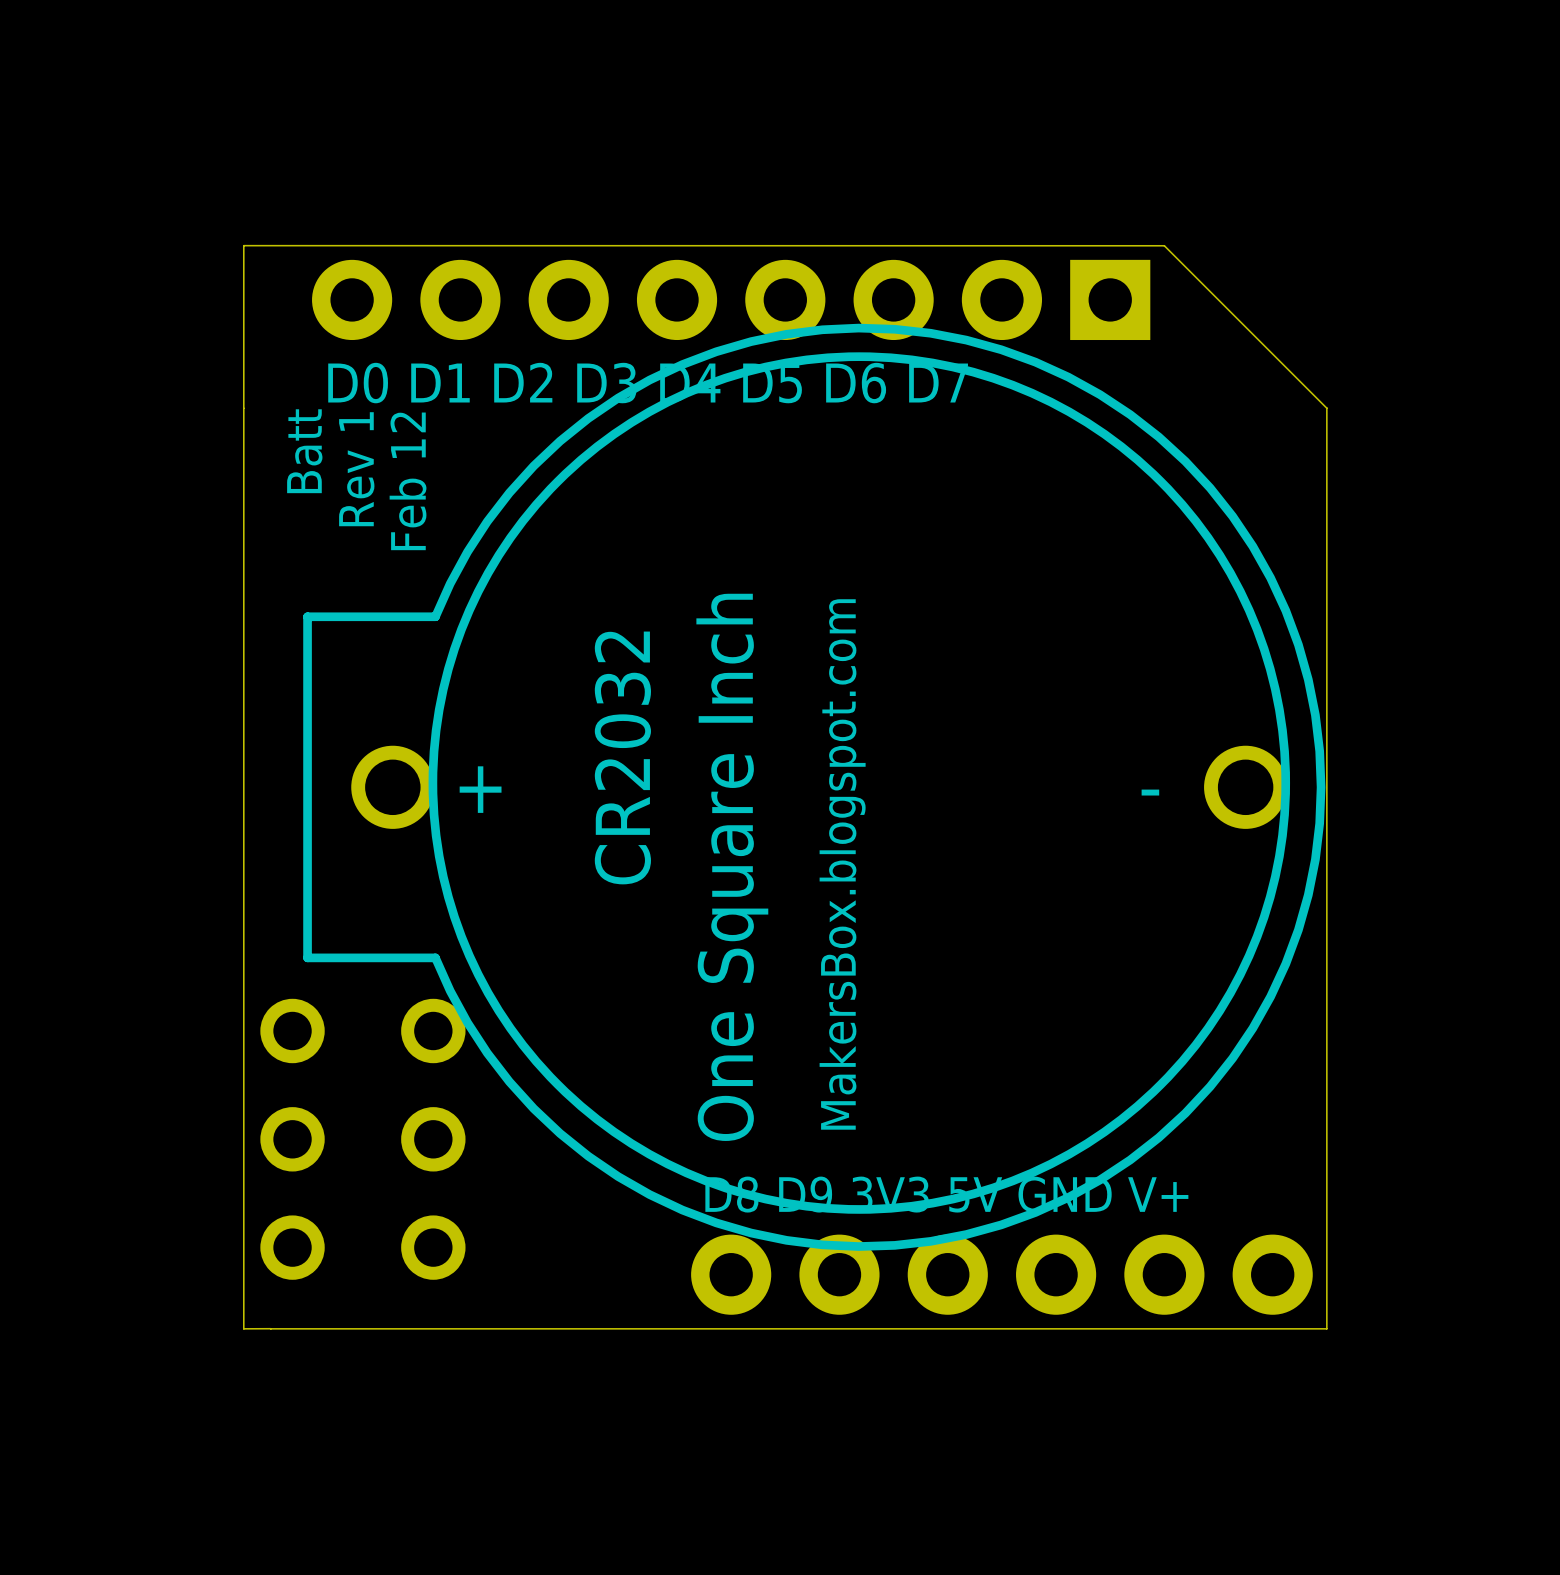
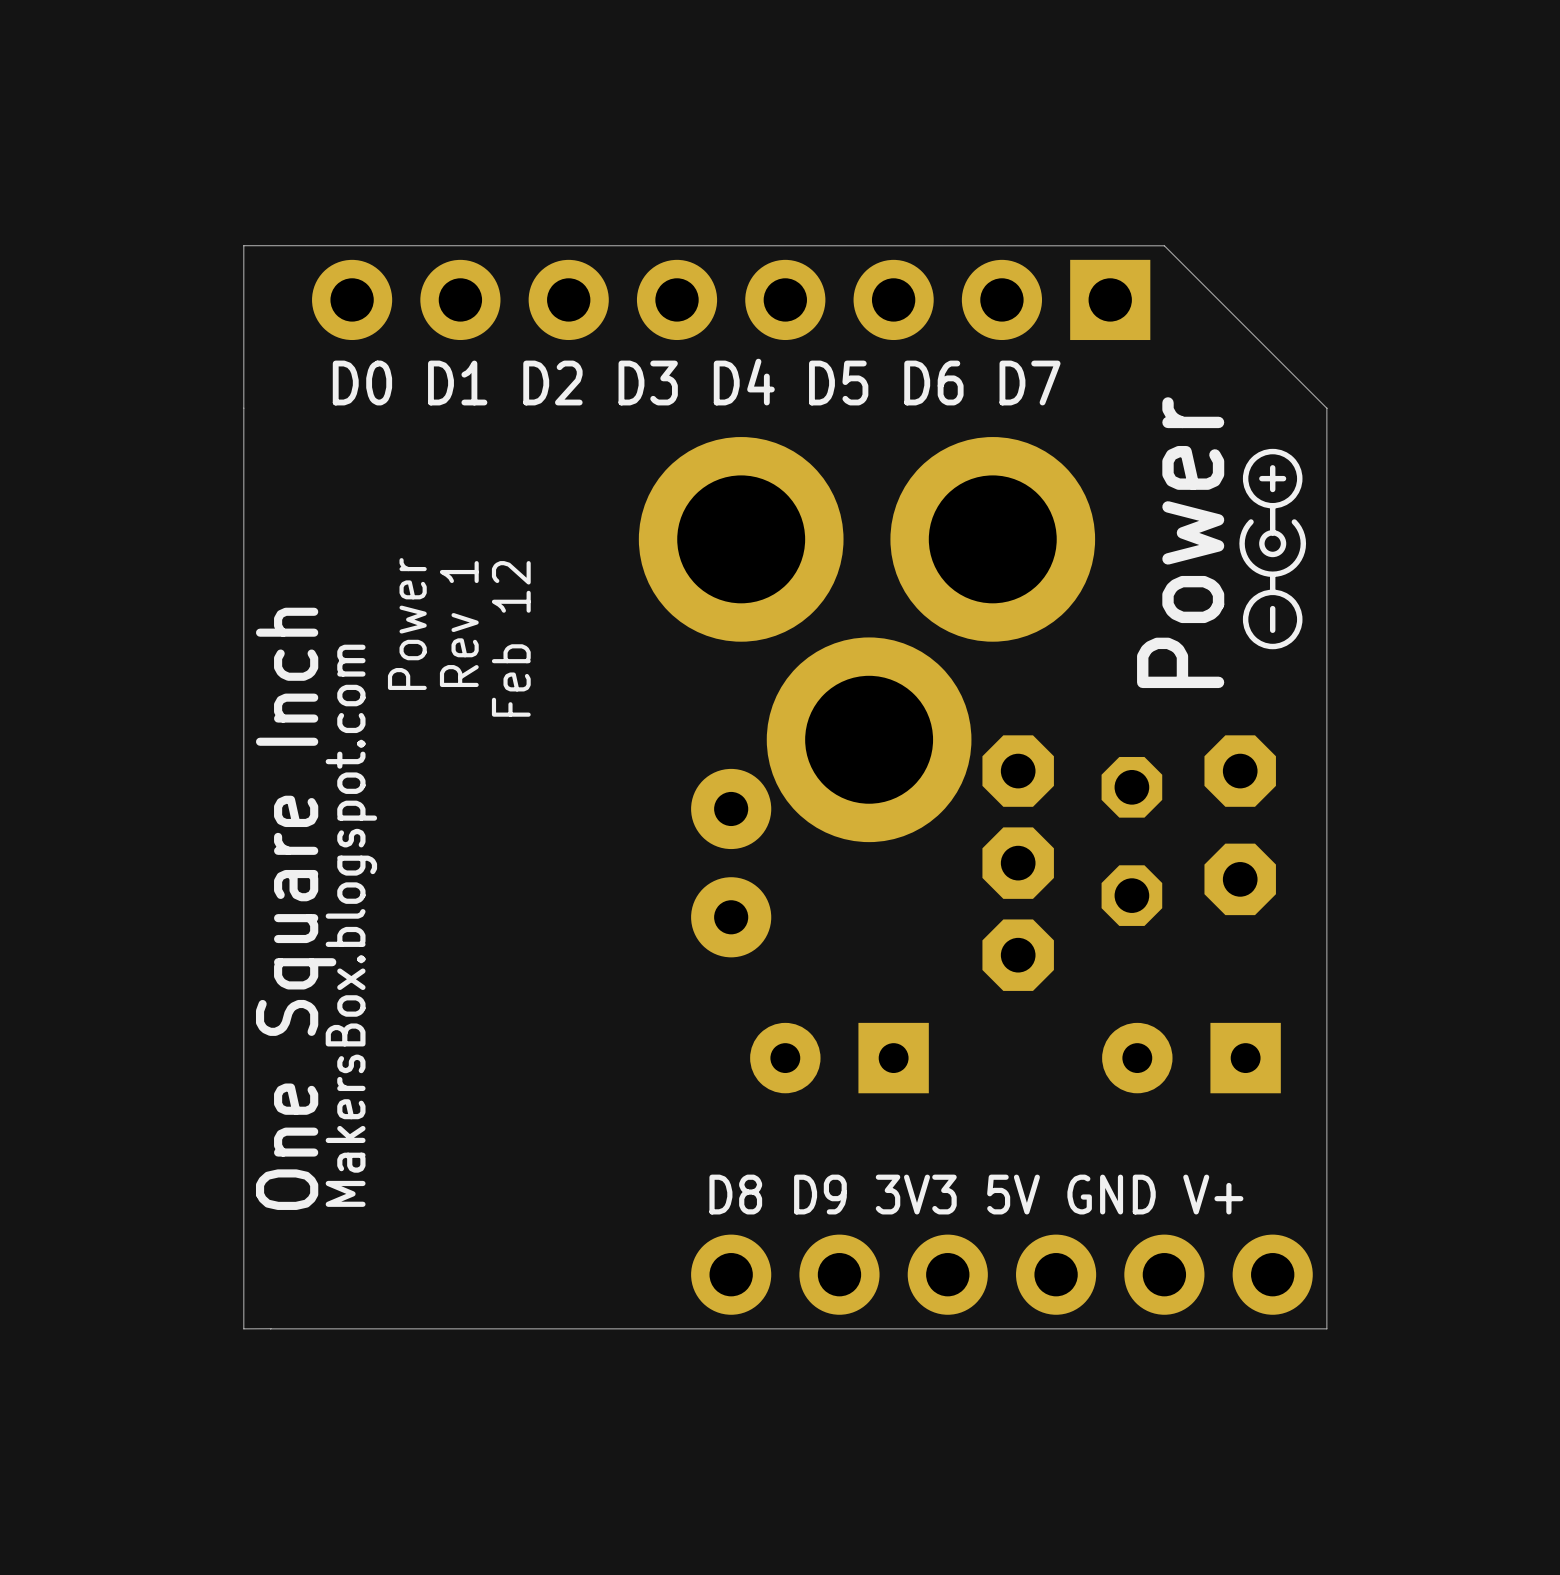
drawing: none -> [1239, 448, 1307, 650]
text: Batt (304, 451) -> none
text position: Rev 1 (356, 469) -> Rev 1 (459, 624)
text position: Feb 12 (408, 481) -> Feb 12 (511, 638)
text: none -> Power (1180, 542)
text: none -> Power (407, 624)
part: none -> (866, 639)
part: (814, 787) -> none
part: none -> (1240, 825)
part: none -> (1131, 841)
part: none -> (731, 863)
part: none -> (1018, 863)
text position: MakersBox.blogspot.com (842, 864) -> MakersBox.blogspot.com (351, 925)
text position: One Square Inch (732, 867) -> One Square Inch (296, 908)
part: none -> (839, 1058)
part: none -> (1191, 1058)
part: (362, 1139) -> none

